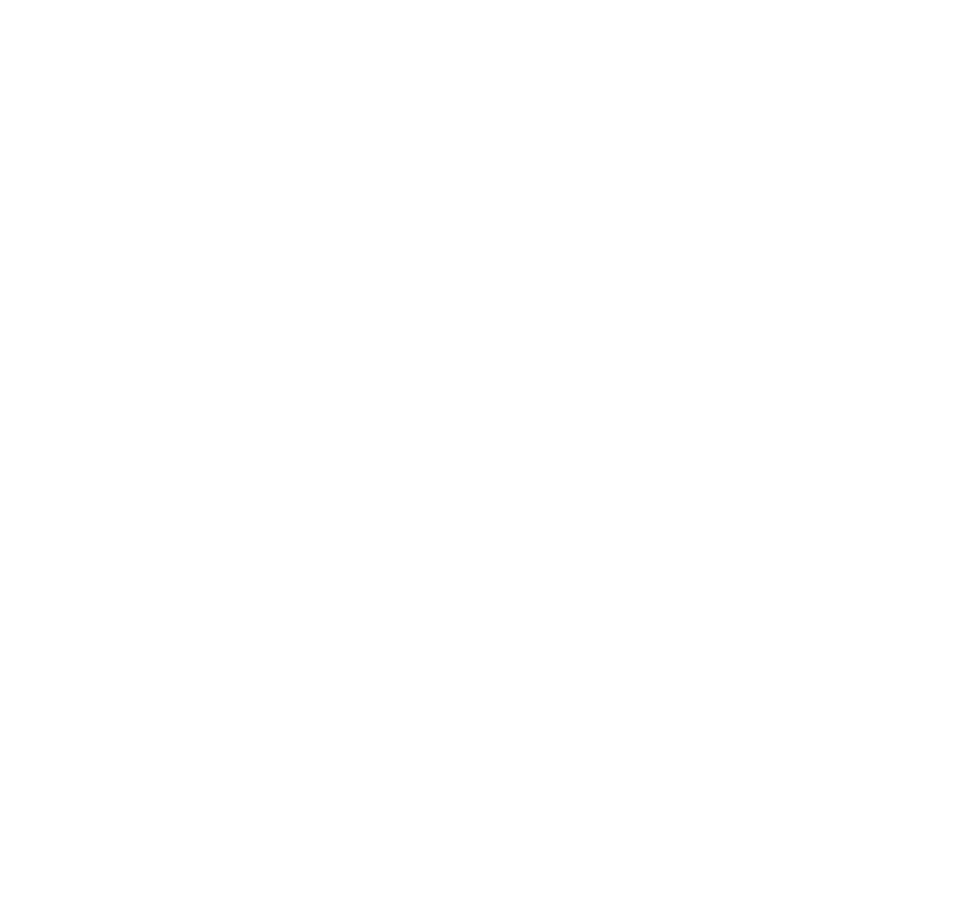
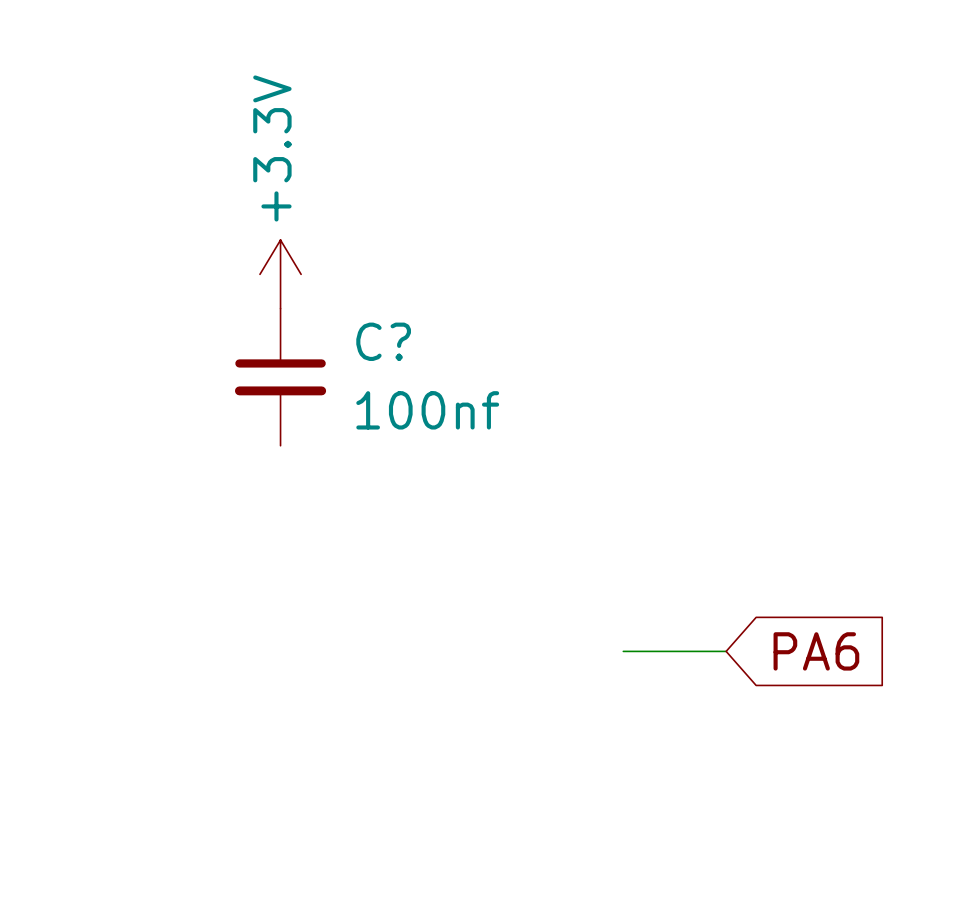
power symbol: none -> +3.3V (280, 274)
C?: none -> 100nf (280, 377)
wire: none -> (623, 651) (726, 651)
global label: none -> PA6 (816, 651)

